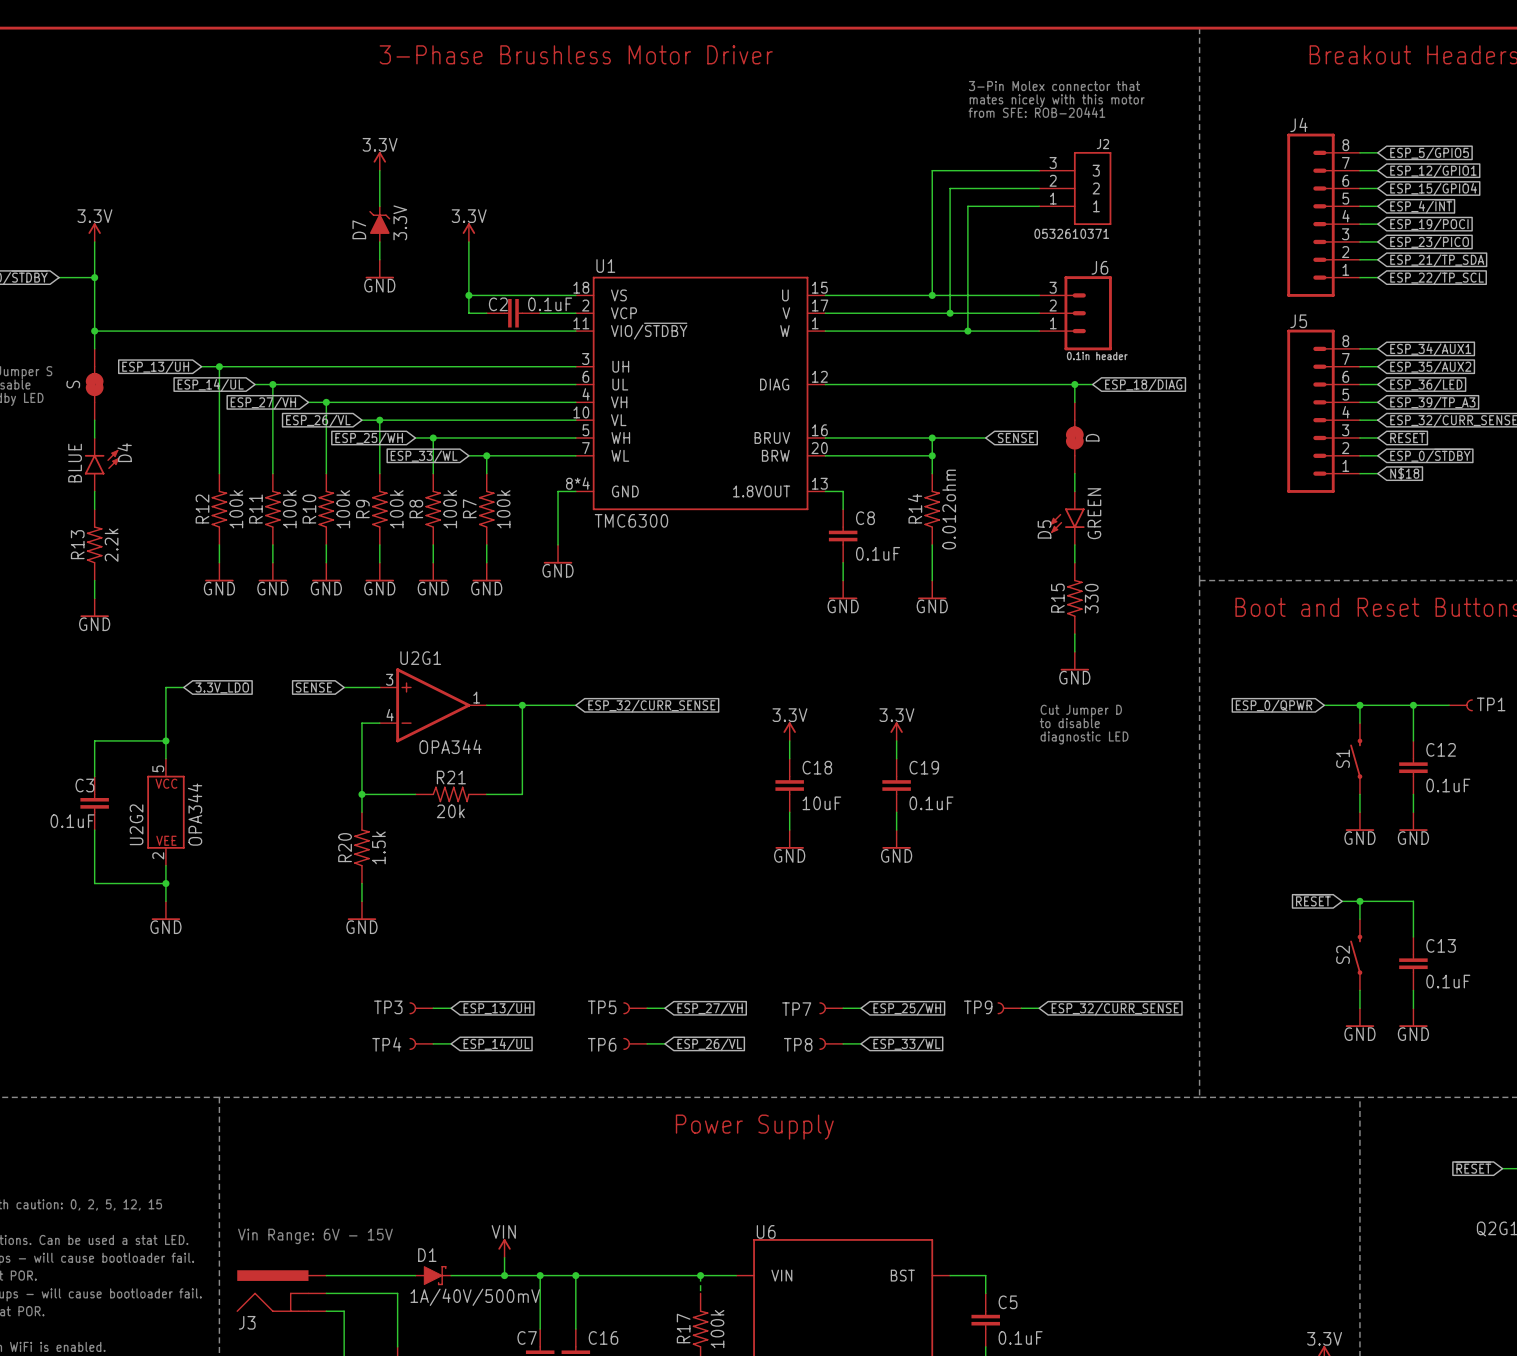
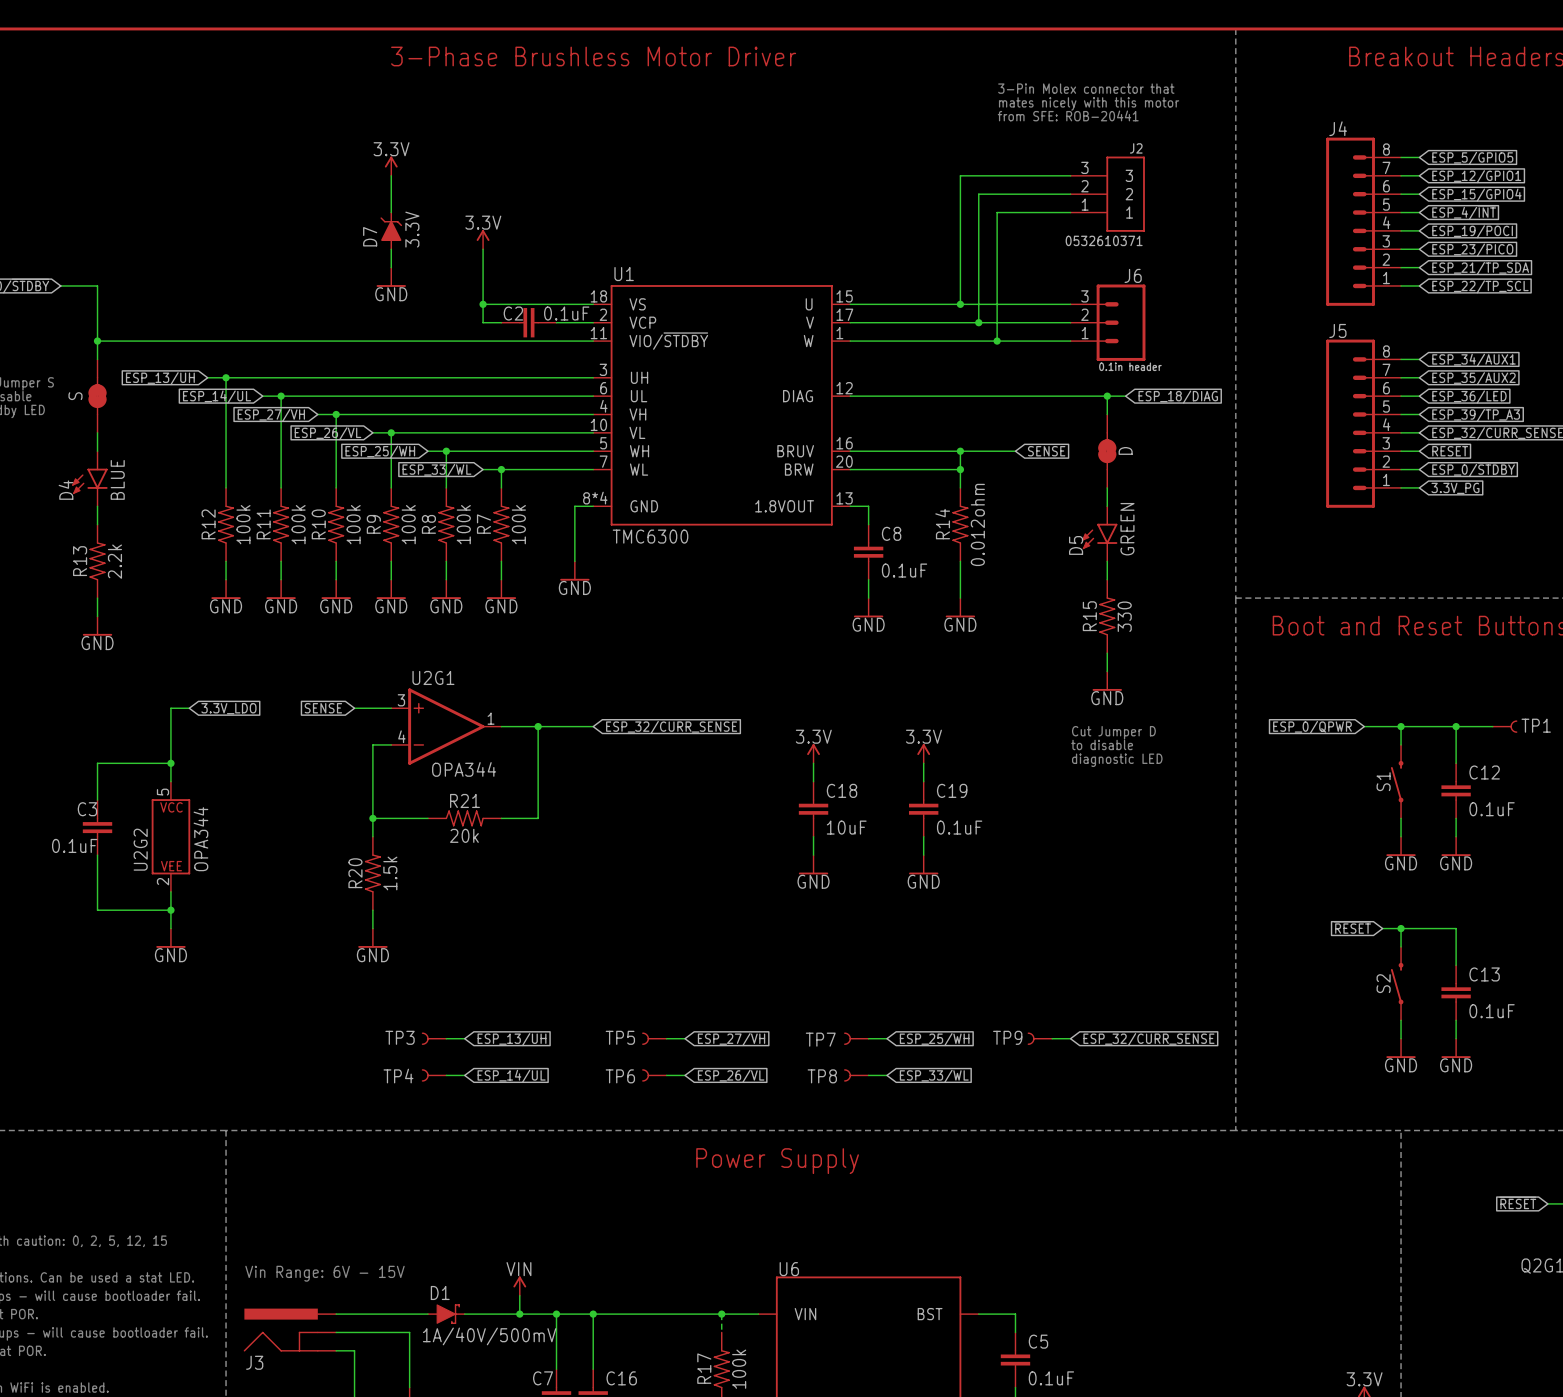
power symbol: 3.3V (94, 232) -> none
wire: (94, 241) (94, 277) -> none
junction: (94, 277) -> none
D4 rotation: 0° (102, 462) -> 180° (89, 481)
global label: N$18 (1404, 473) -> 3.3V_PG (1455, 488)

